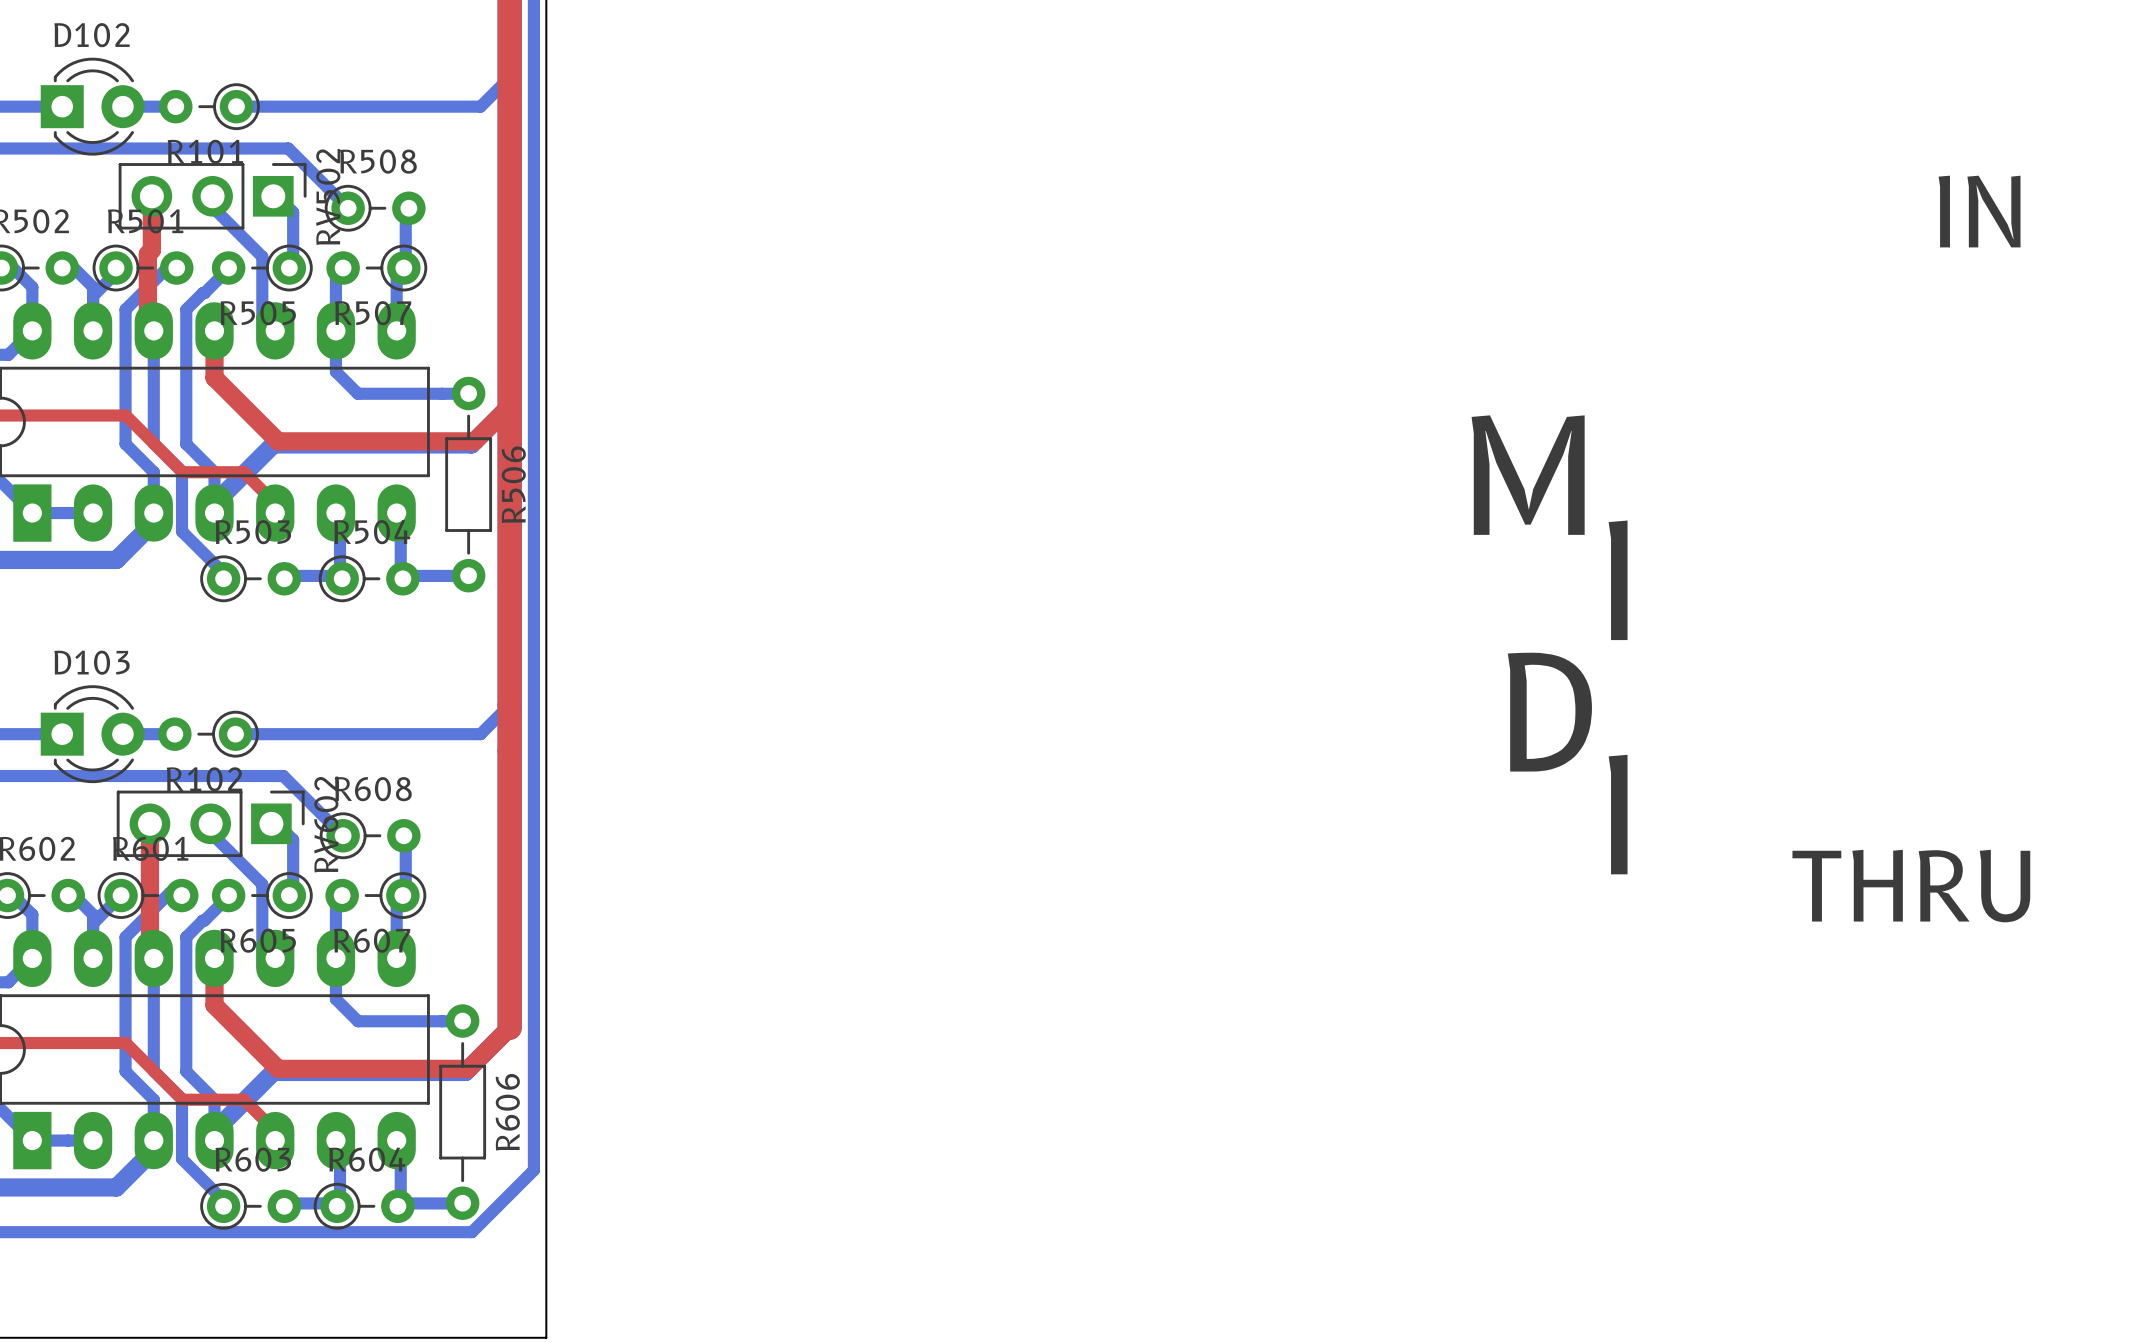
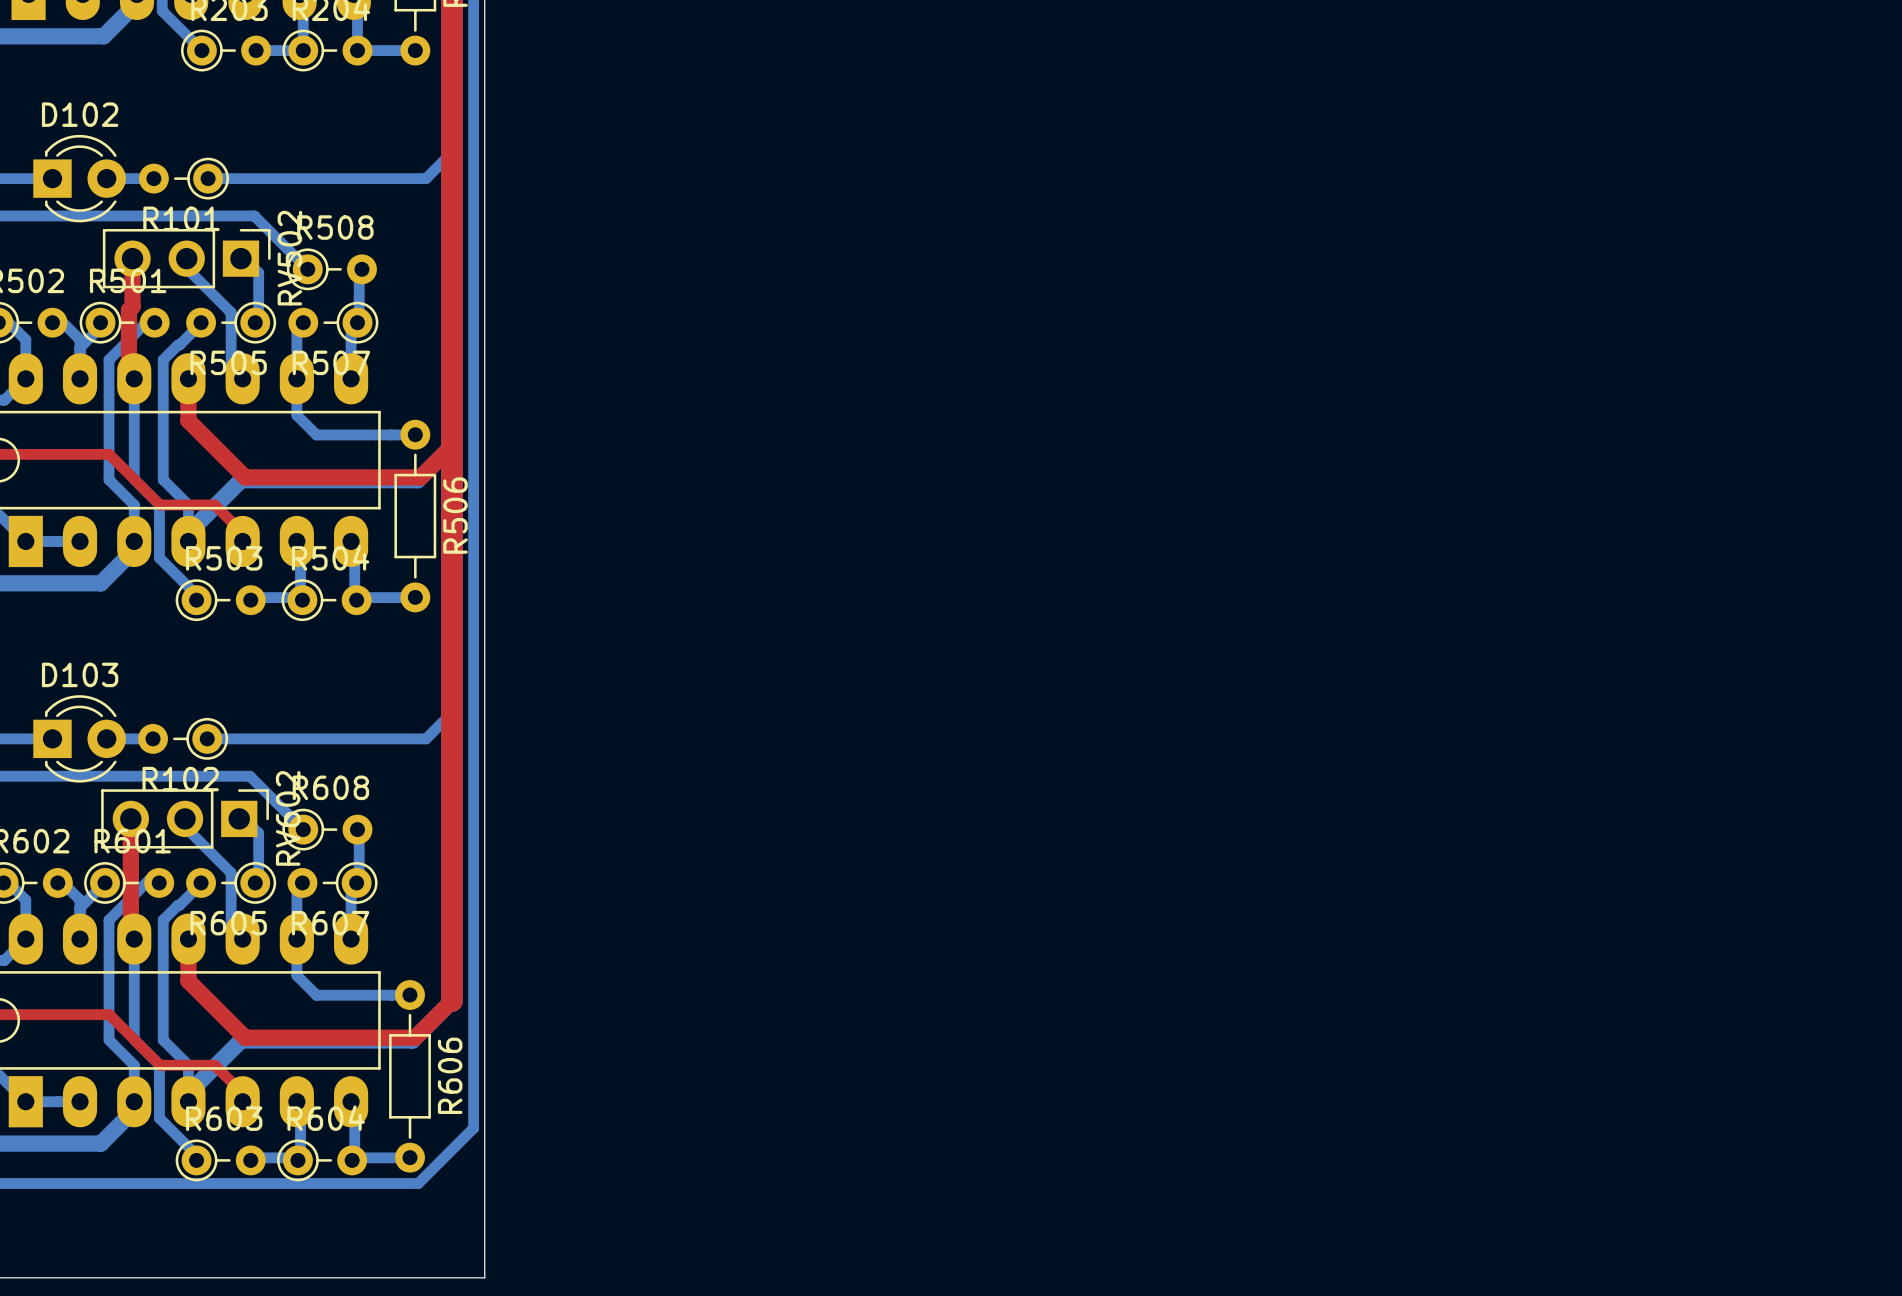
text: IN (1979, 211) -> none
text: M (1528, 475) -> none
text: I (1618, 580) -> none
text: D (1549, 712) -> none
text: I (1618, 814) -> none
text: THRU (1911, 886) -> none

